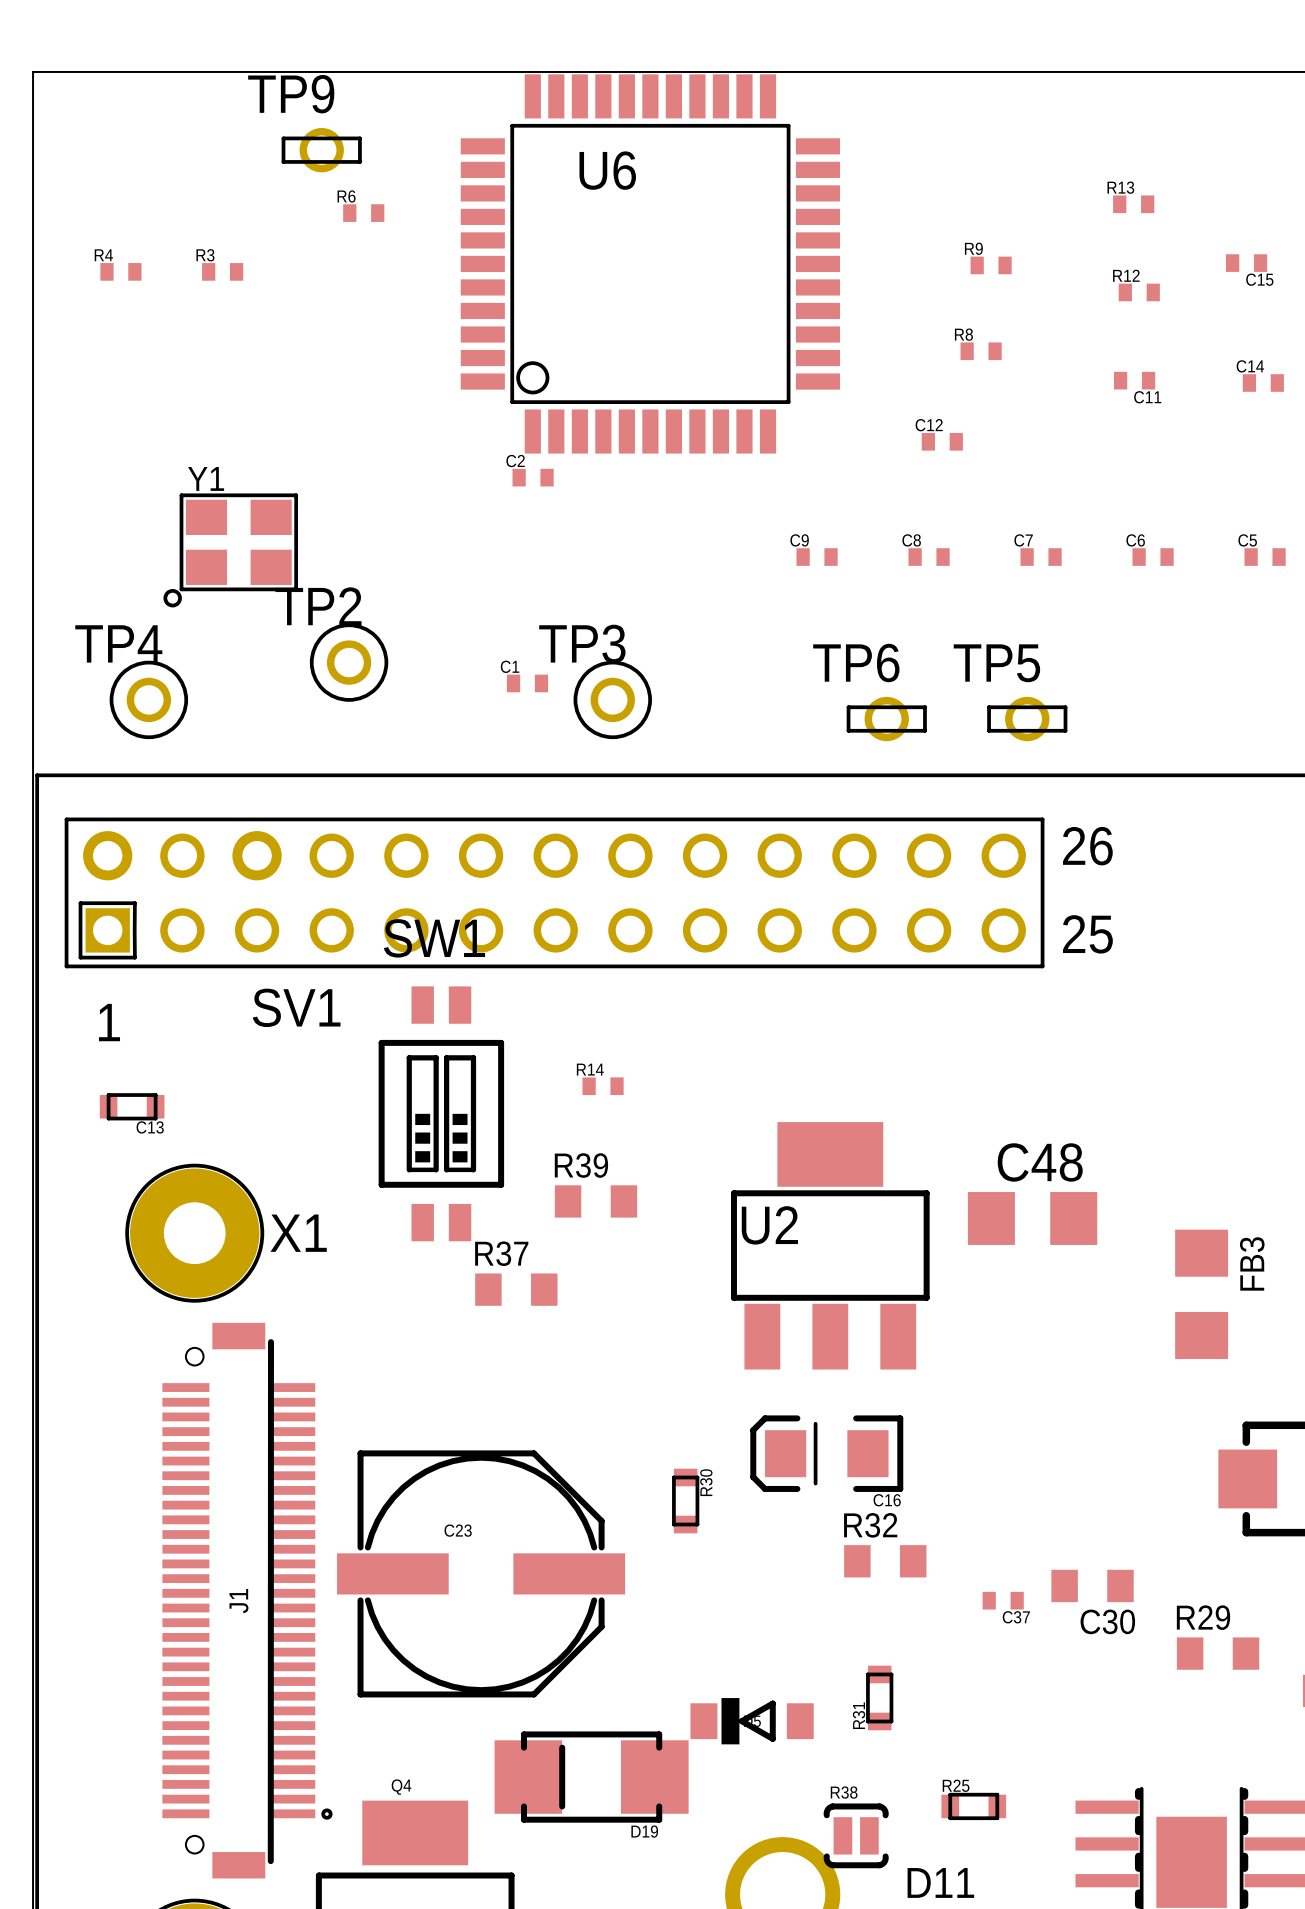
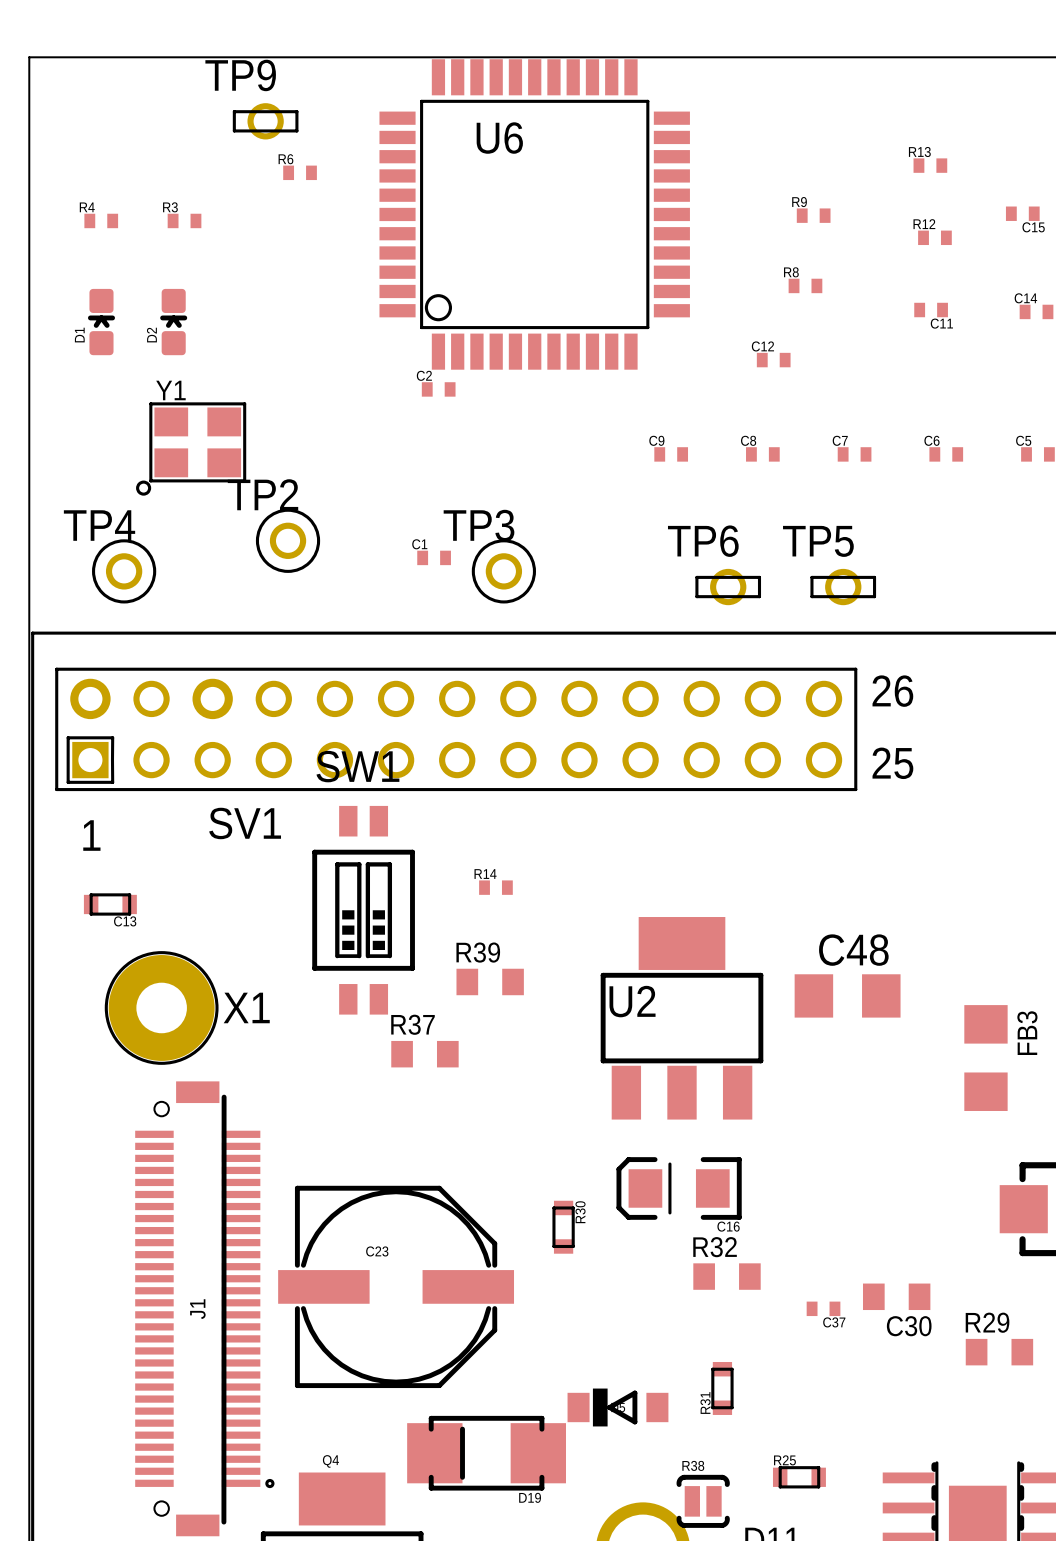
D1: none -> (101, 322)
D2: none -> (173, 322)

